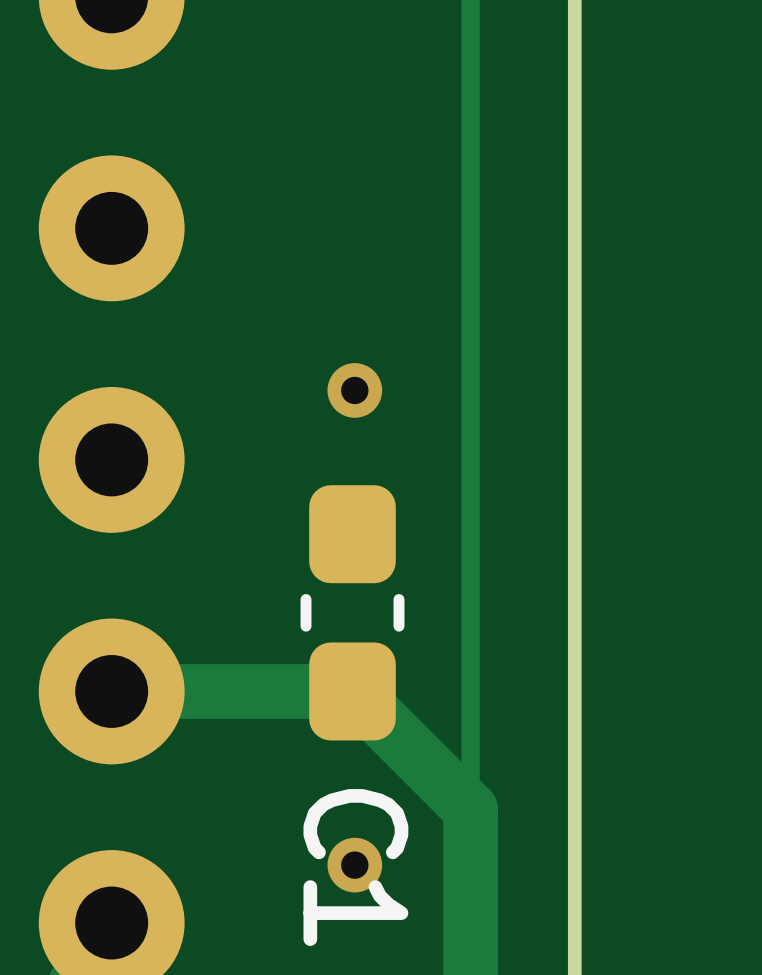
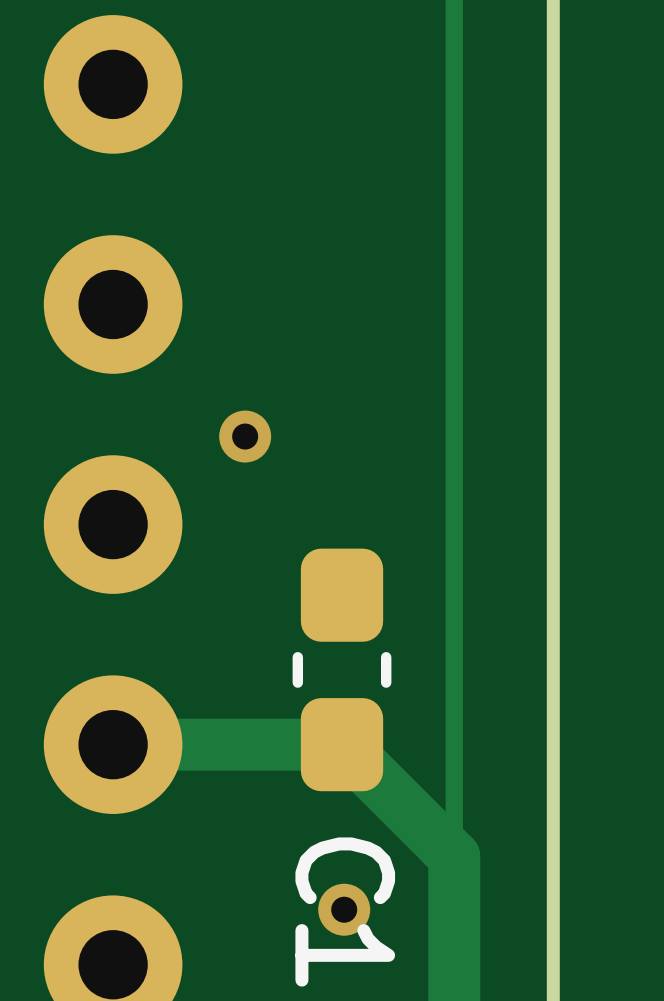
via position: (354, 390) -> (245, 436)

